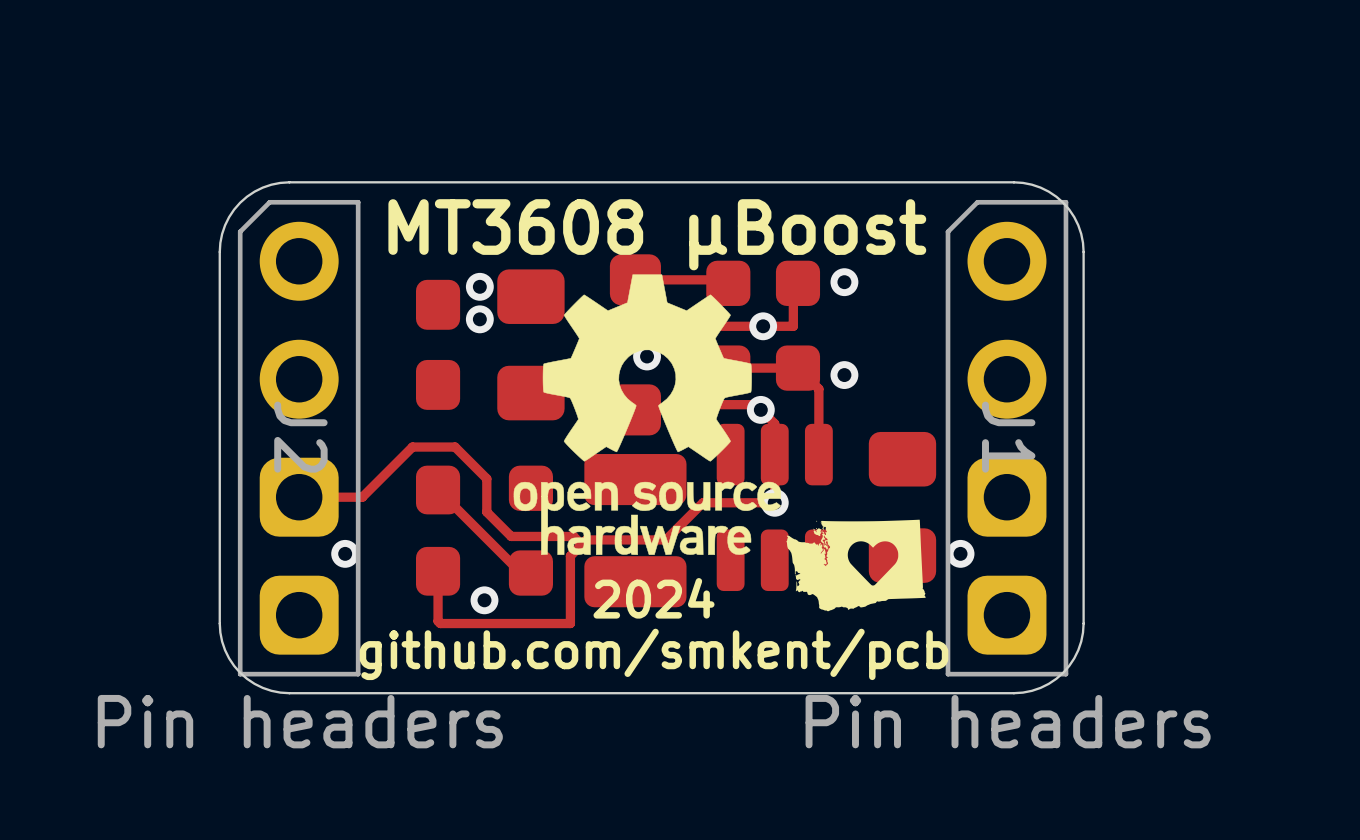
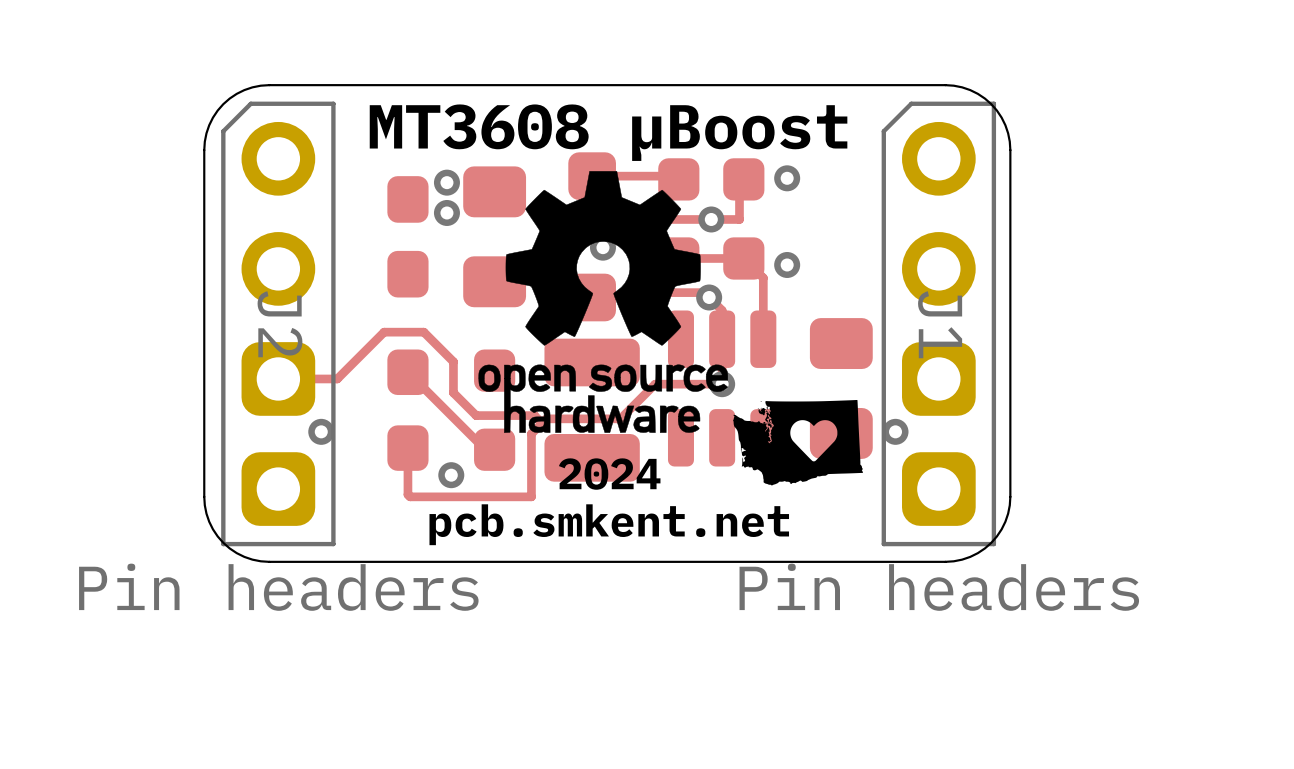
text: github.com/smkent/pcb (654, 654) -> pcb.smkent.net (609, 524)

